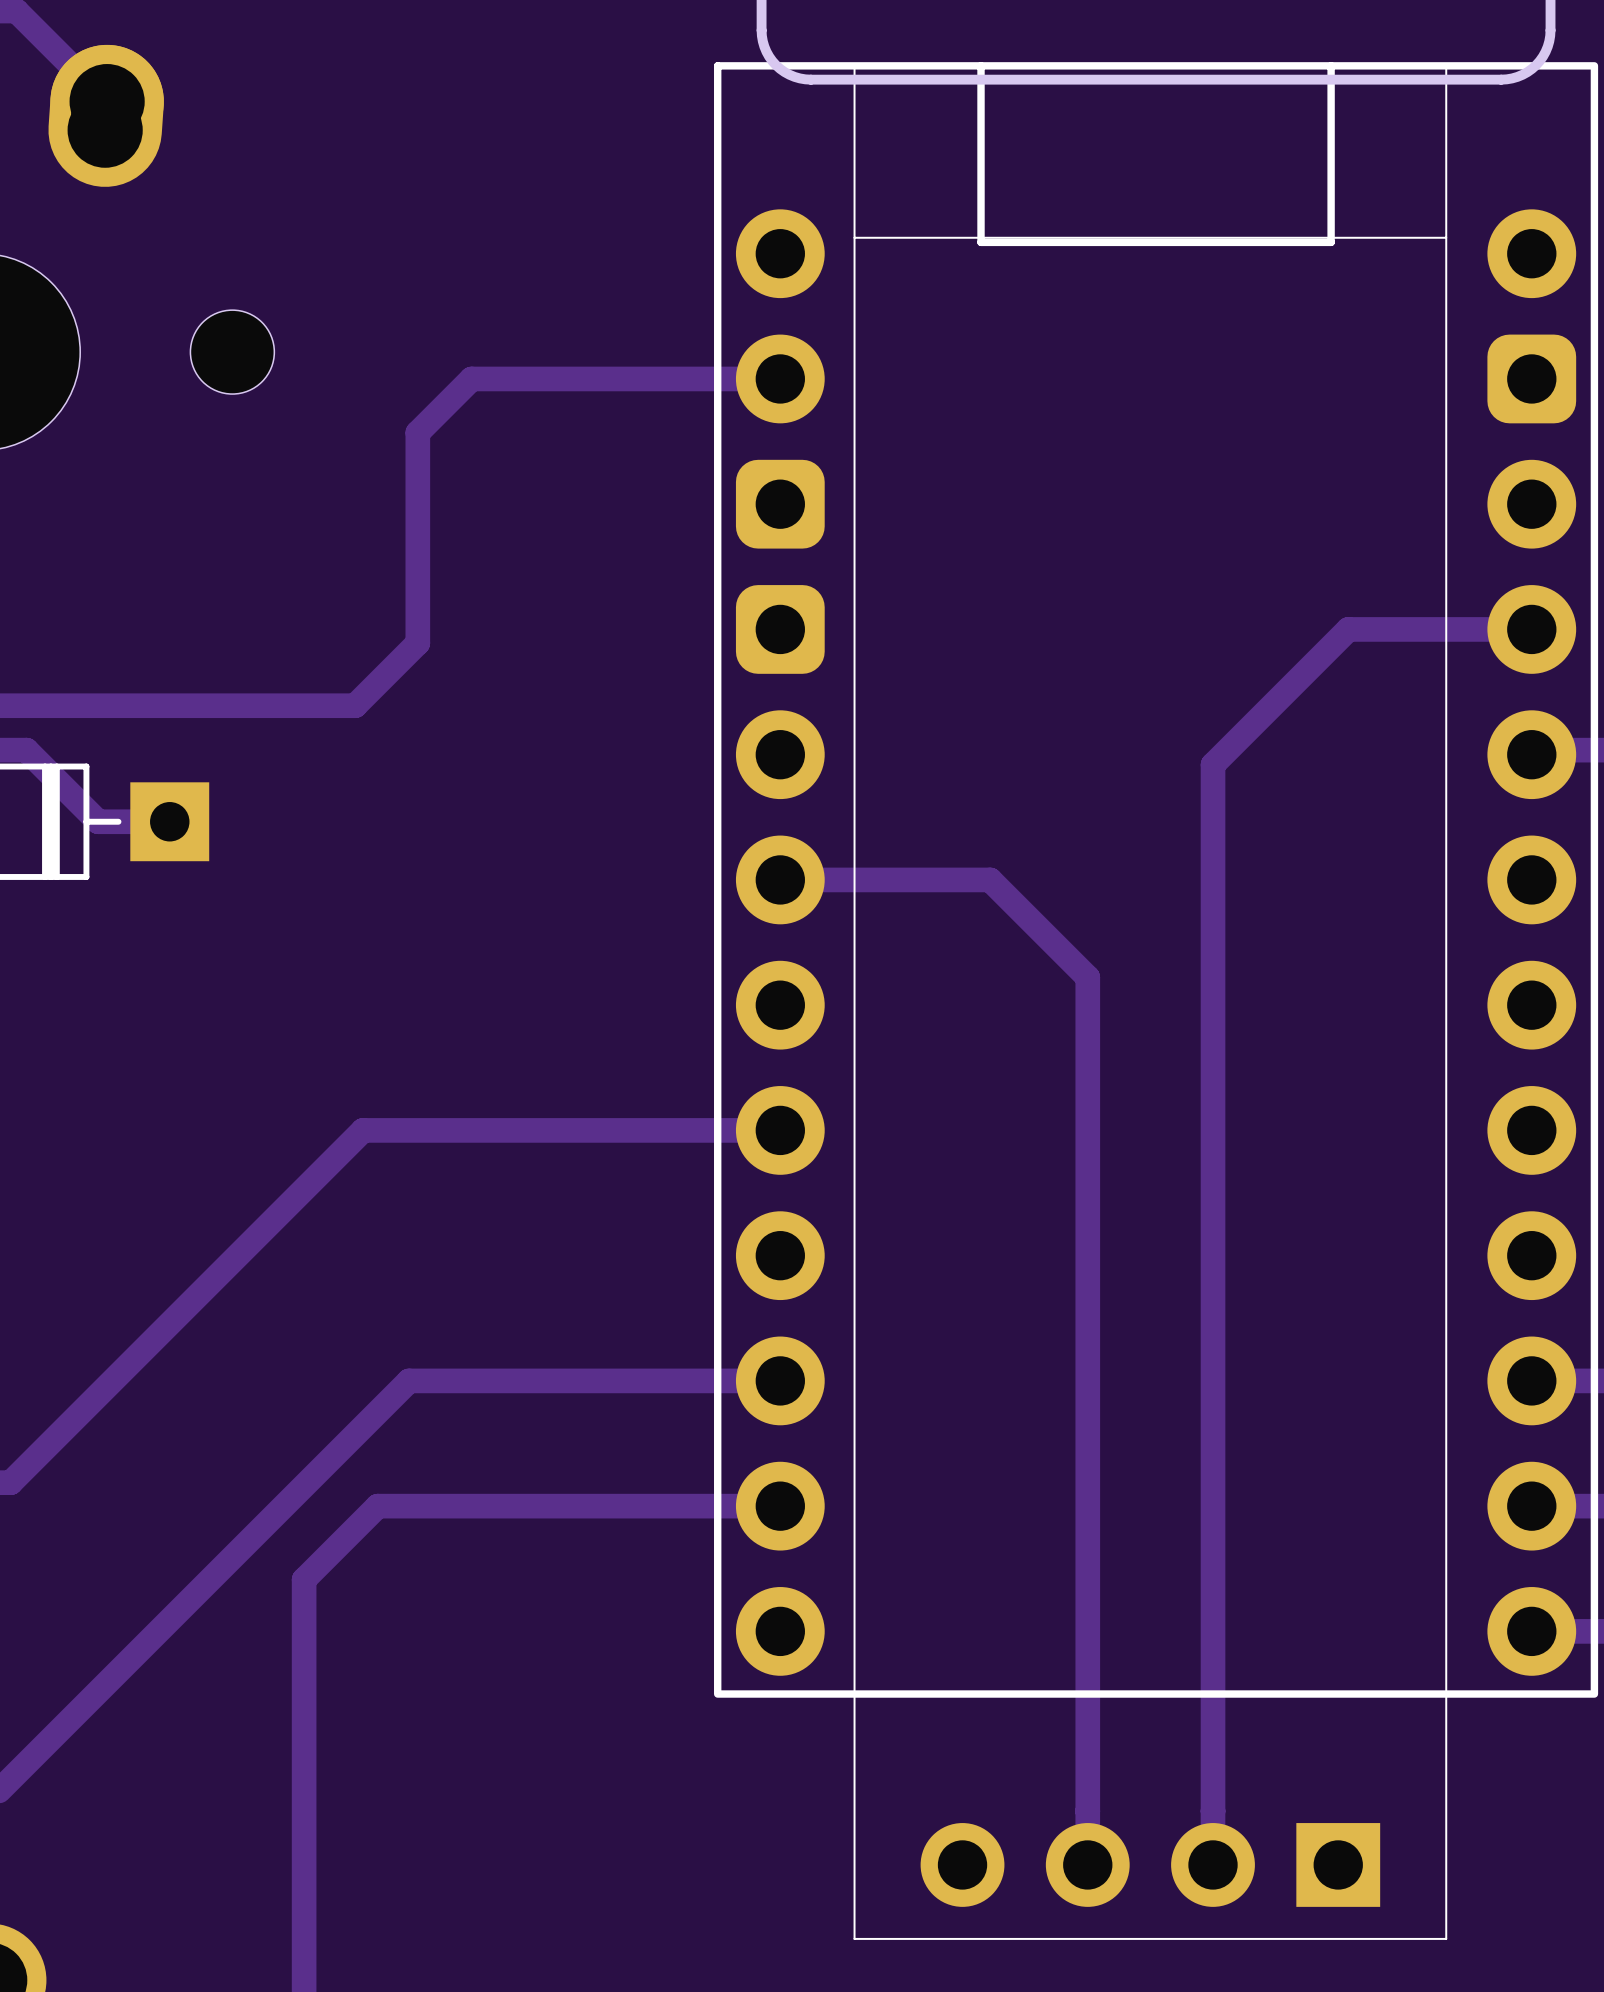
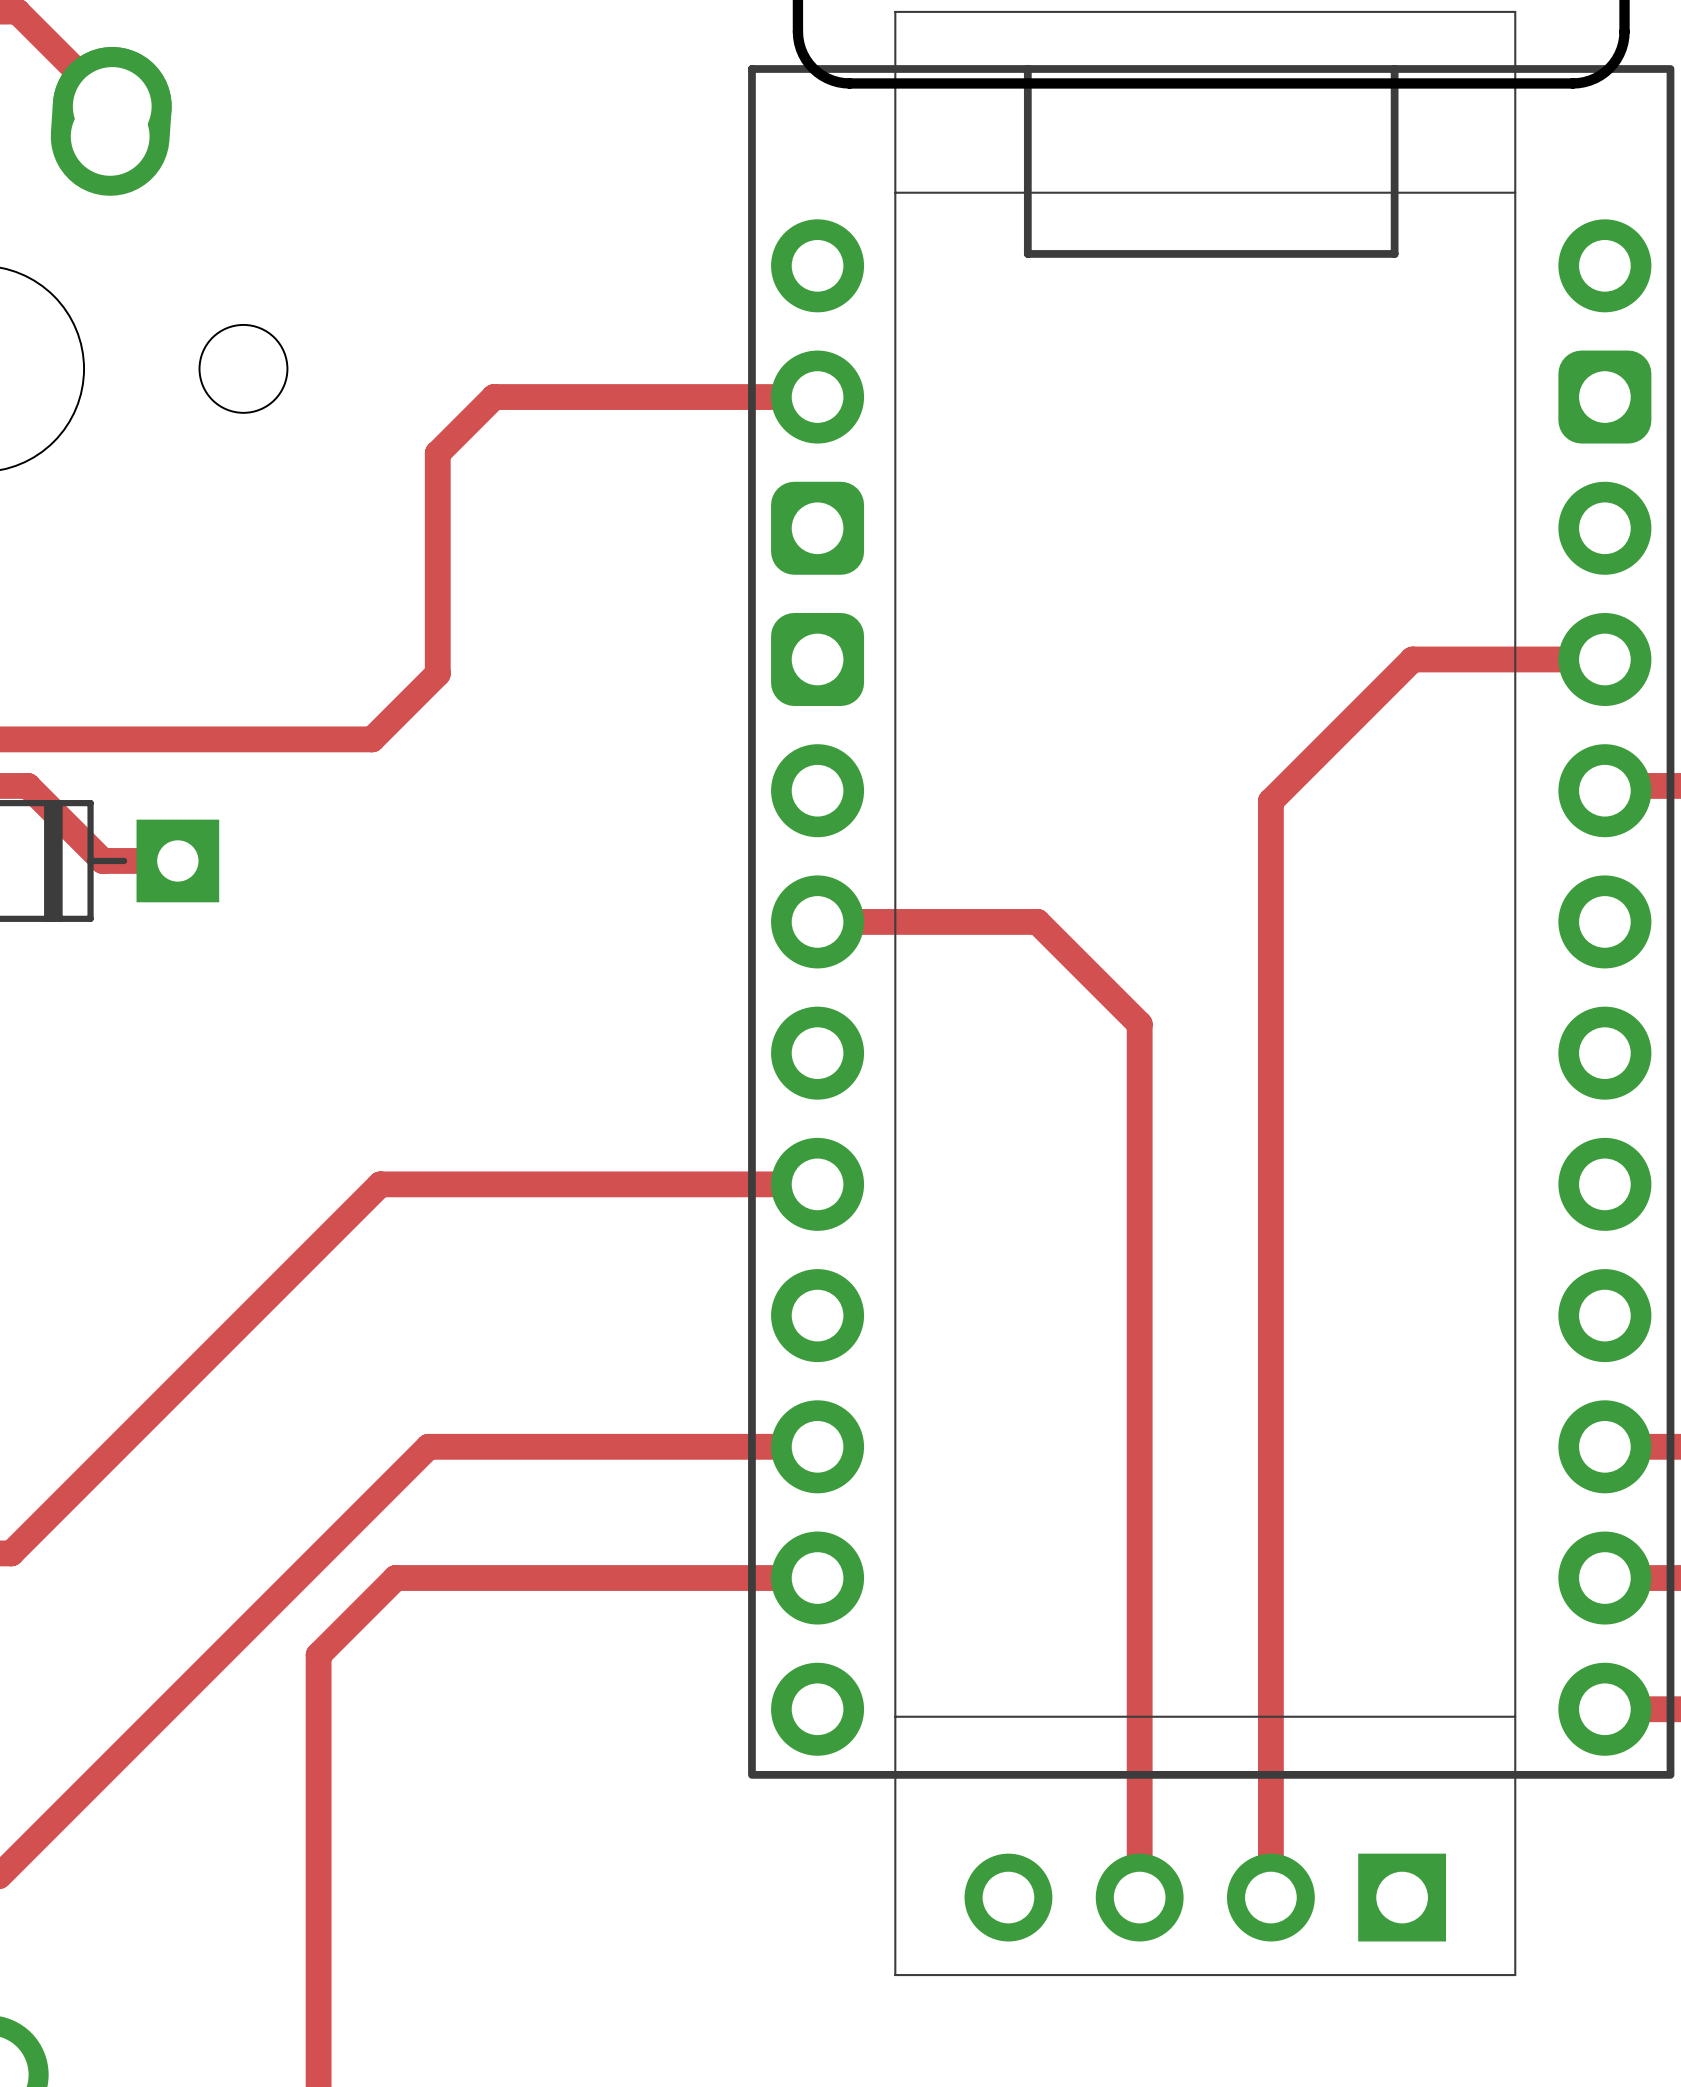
part position: (1150, 1002) -> (1205, 993)

